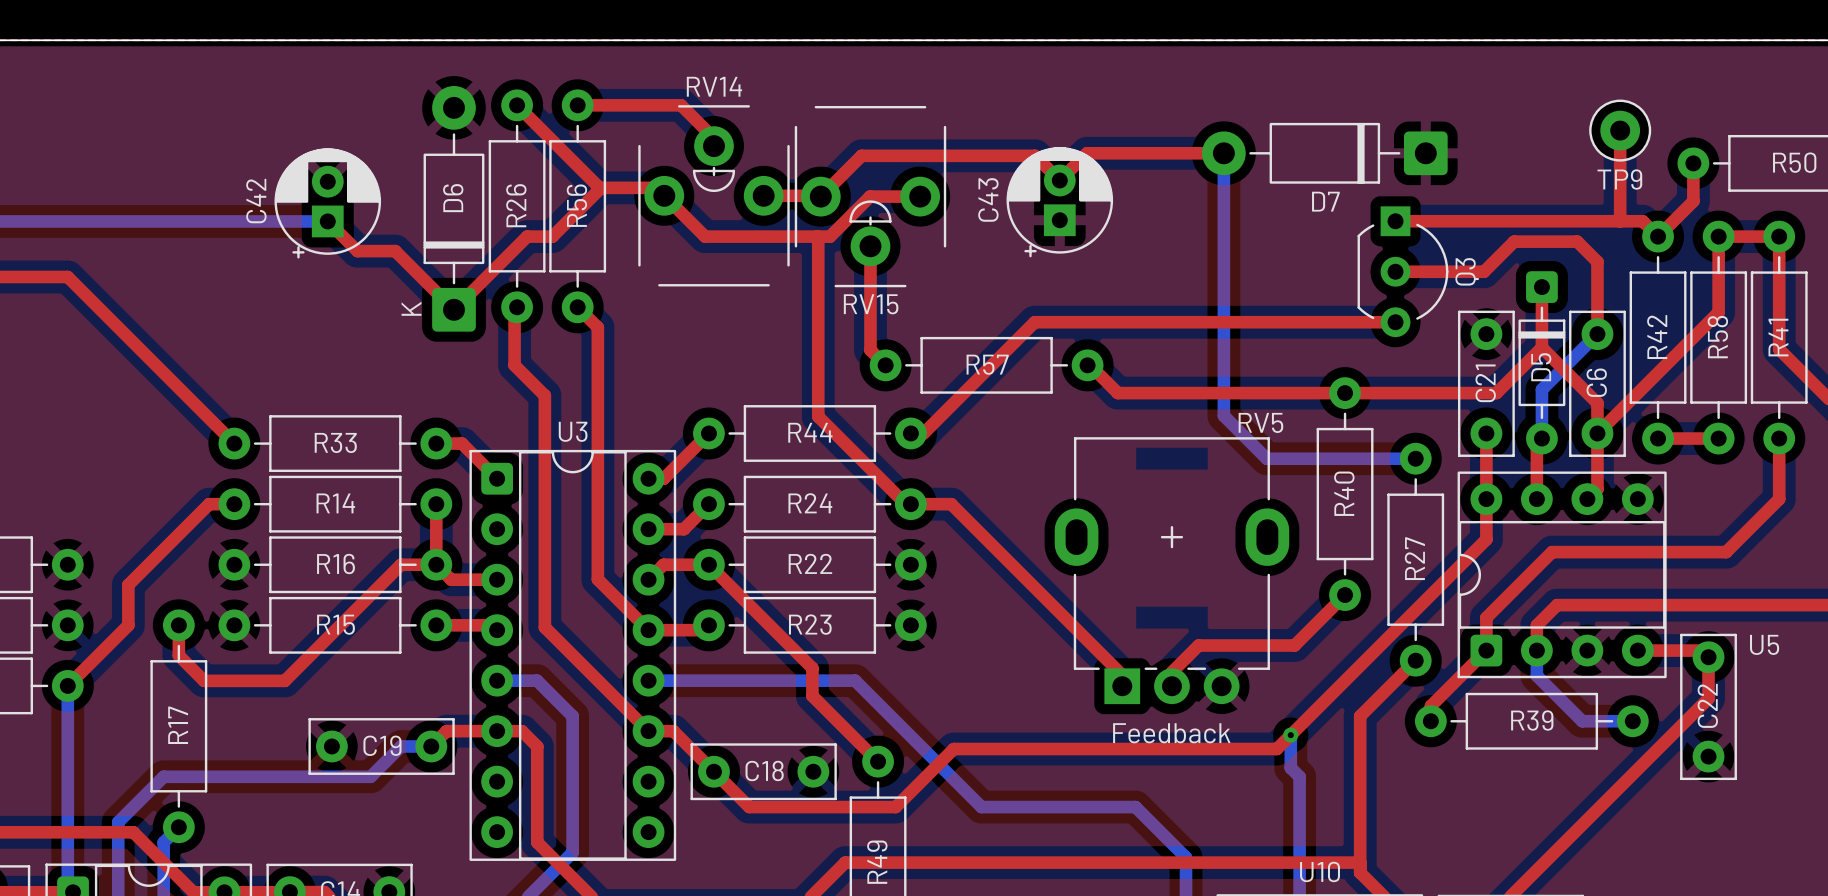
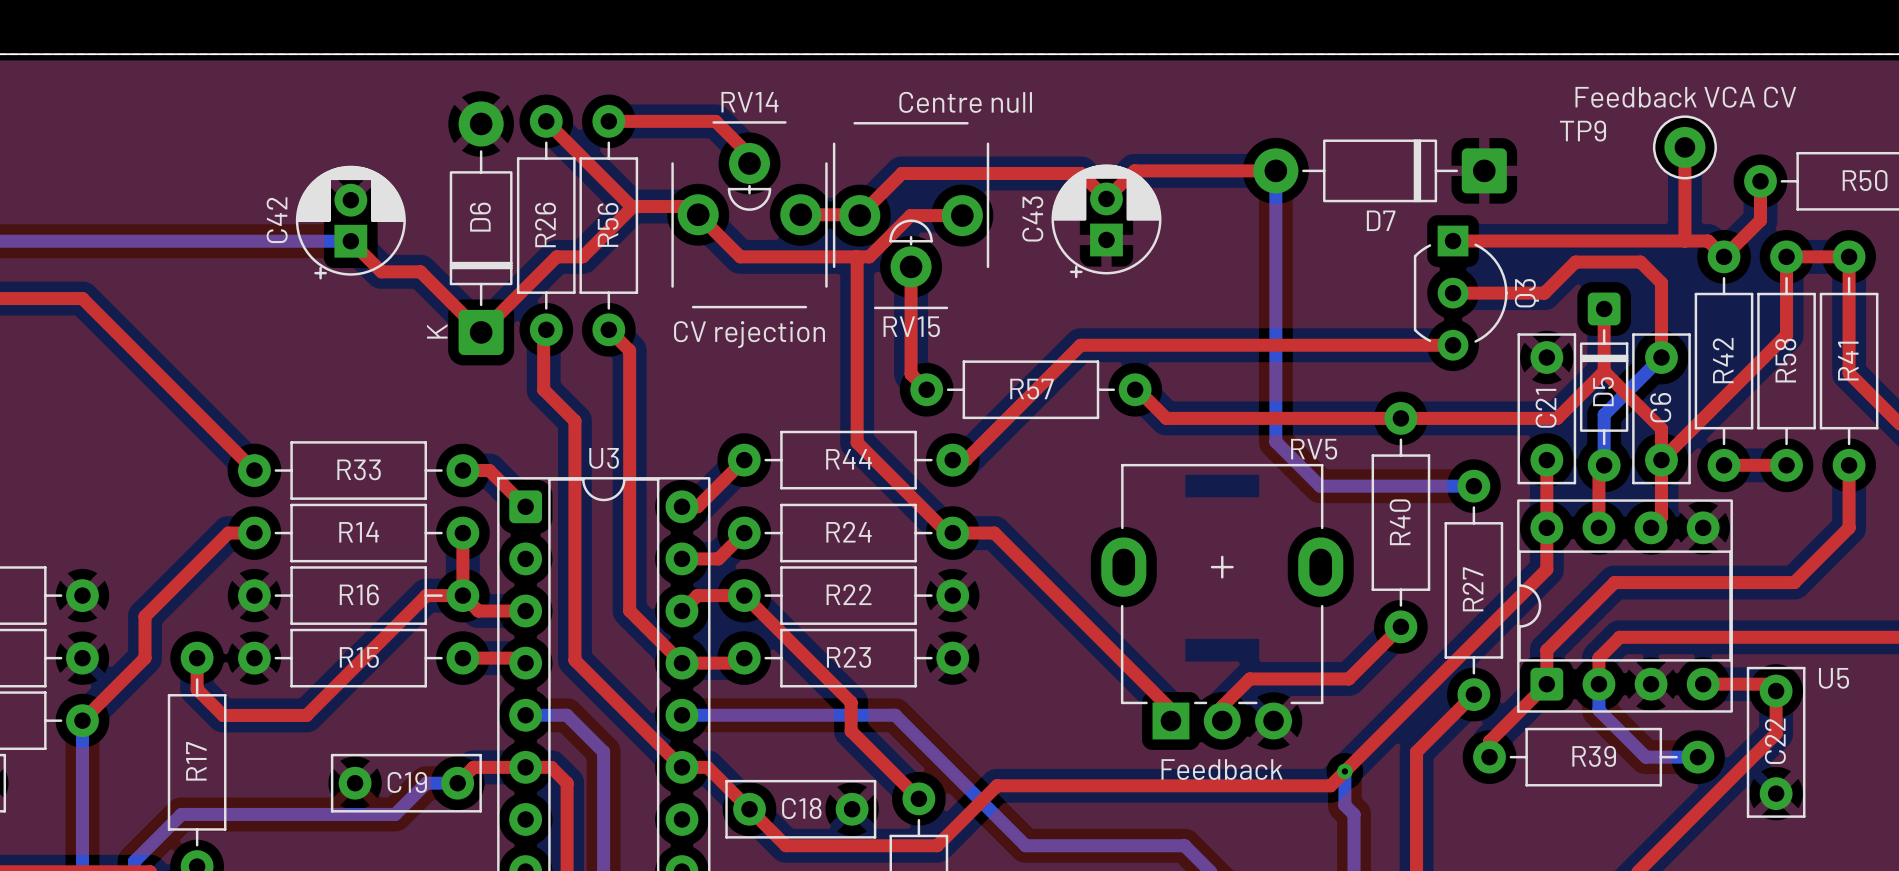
TP9 value: none -> Feedback VCA CV (1685, 97)
RV15 text: none -> Centre null (965, 102)
TP9 name position: TP9 (1619, 179) -> TP9 (1582, 131)
RV14 text: none -> CV rejection (749, 334)

